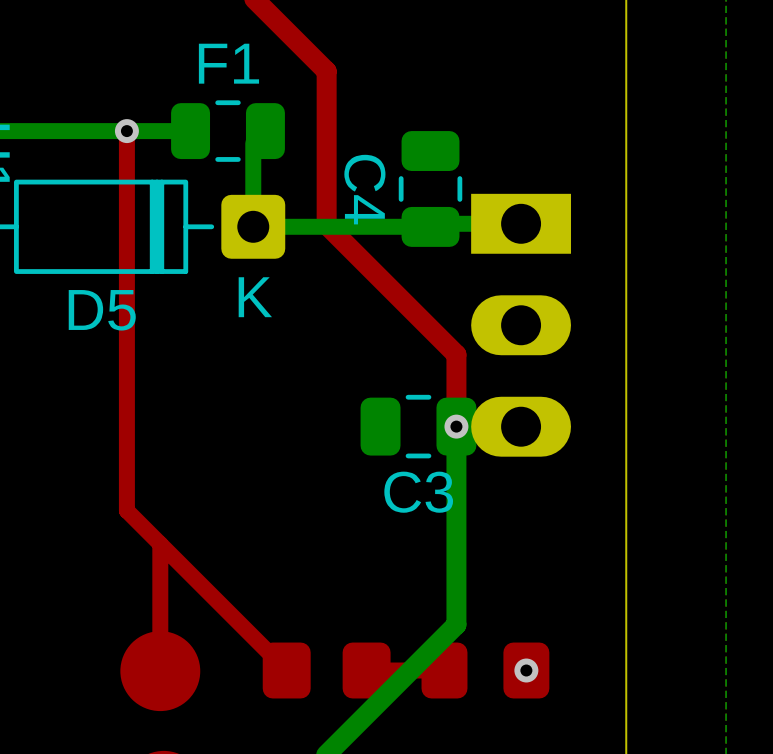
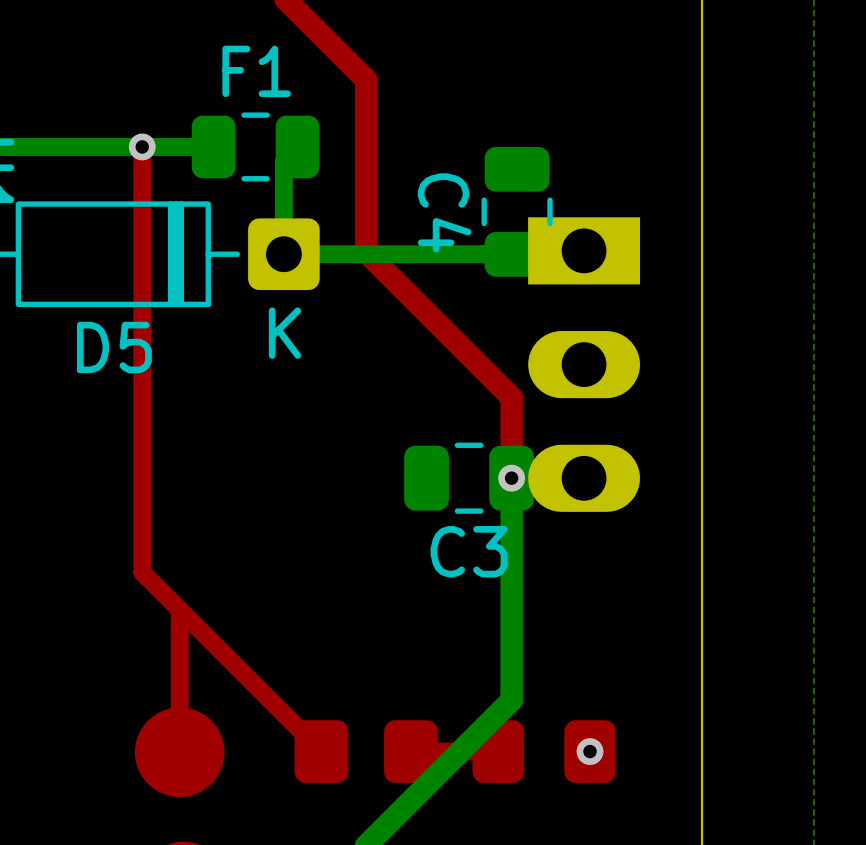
C4 position: (430, 188) -> (517, 211)

